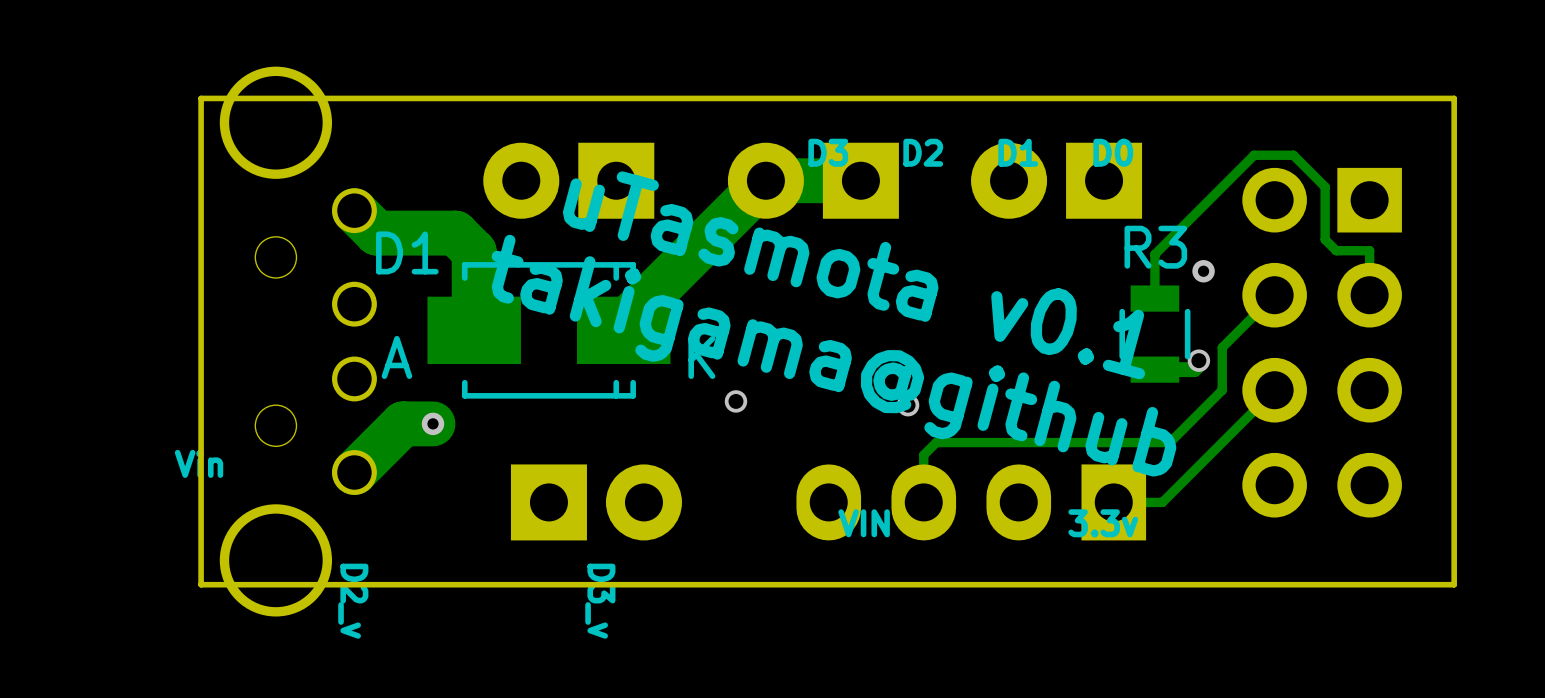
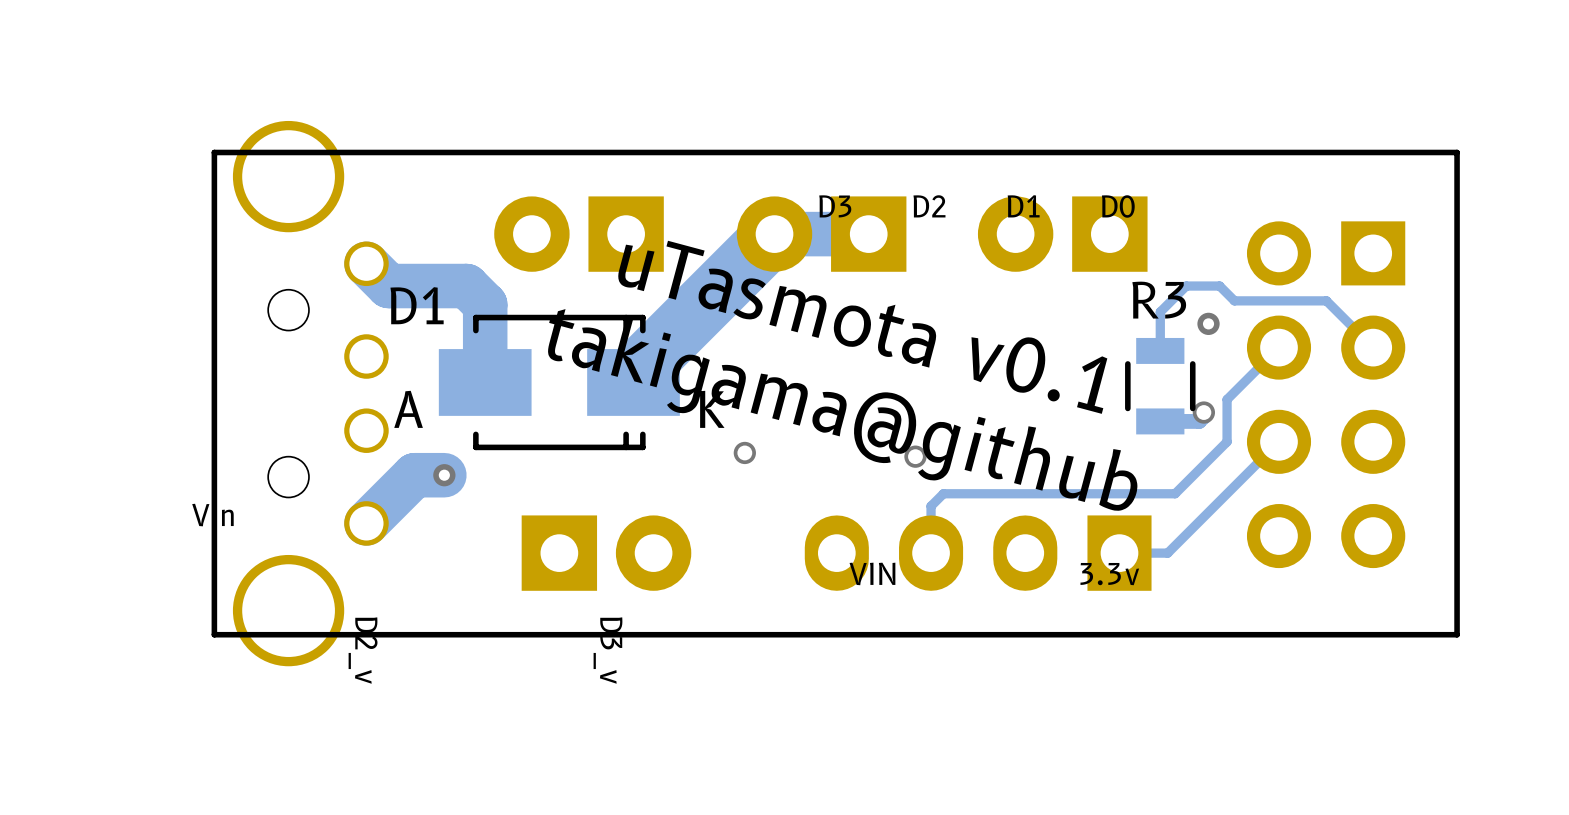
track width: thin (765, 180) (623, 322) -> thick (774, 234) (633, 375)
track: (1154, 259) (1154, 254) (1254, 155) (1293, 155) (1325, 186) (1325, 239) (1336, 250) (1369, 250) (1369, 295) -> (1160, 312) (1186, 286) (1219, 286) (1234, 300) (1326, 300) (1373, 347)

